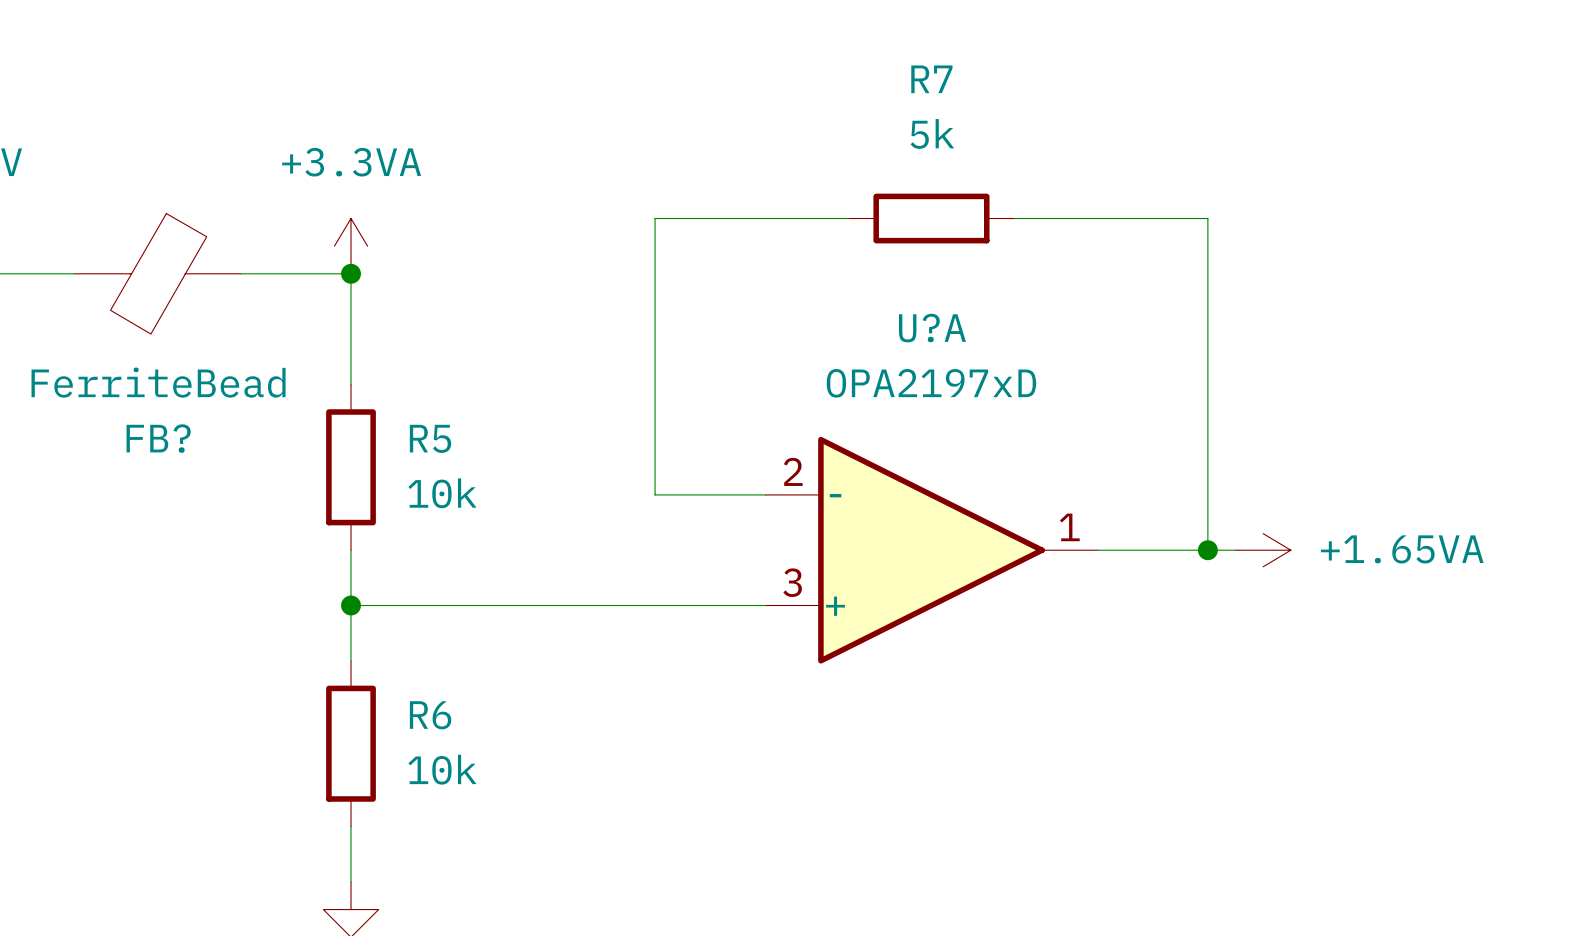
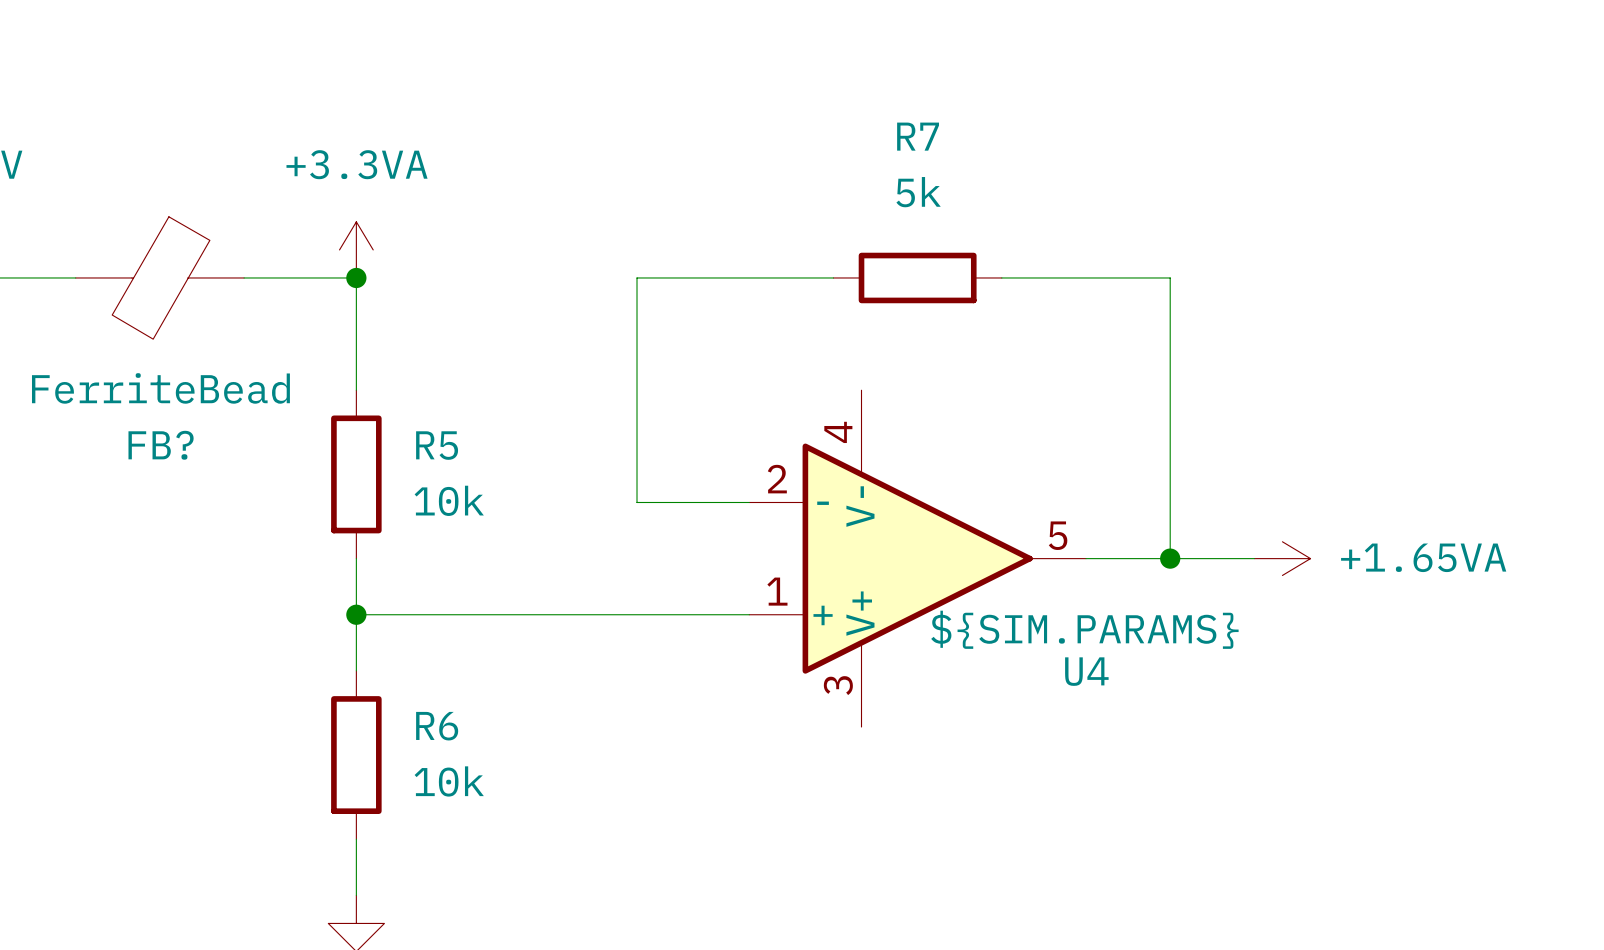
wire: (848, 218) (655, 218) (655, 494) -> (833, 277) (637, 277) (637, 502) (665, 502)
R7 position: (931, 218) -> (917, 277)
wire: (1014, 218) (1207, 218) (1207, 550) -> none
wire: none -> (1001, 277) (1170, 277) (1170, 558)
U4: none -> ${SIM.PARAMS} (917, 558)
U?A: OPA2197xD (931, 550) -> none
junction position: (1207, 550) -> (1170, 558)

